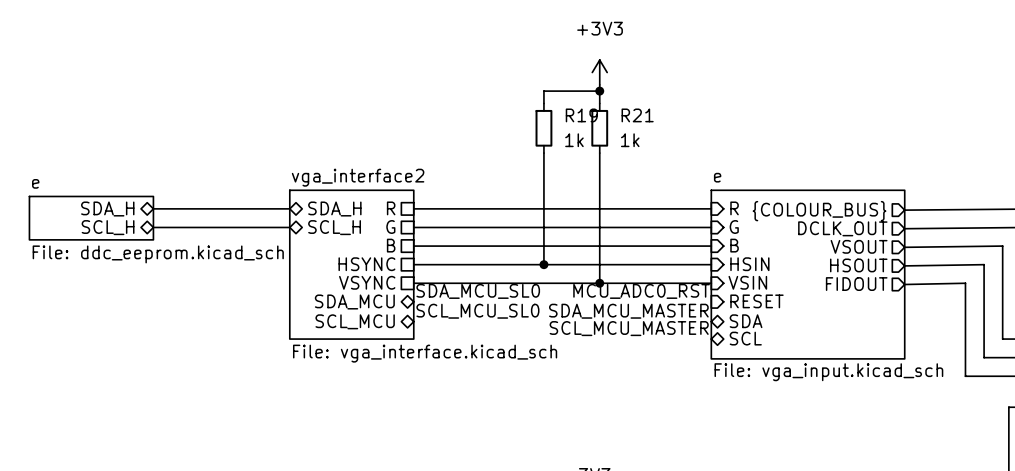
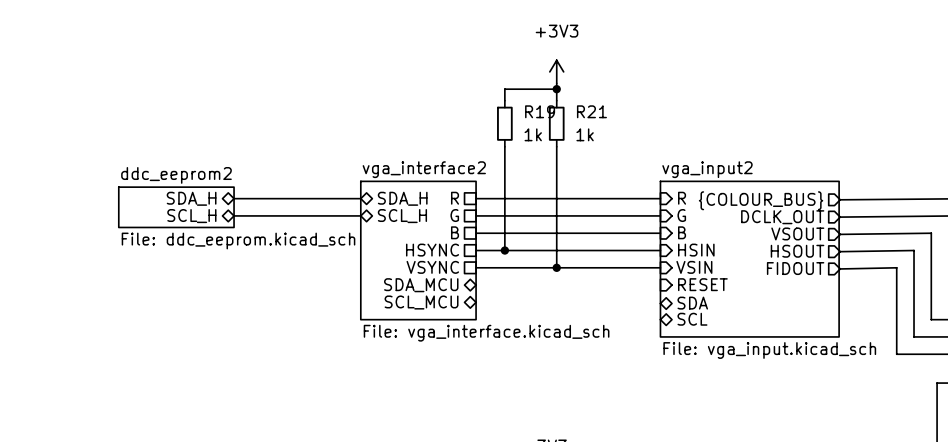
wire: (153, 208) (252, 208) -> none
sheet pin position: R (391, 208) -> R (455, 198)
wire: (413, 208) (512, 208) -> (268, 198) (360, 198)
sheet pin: SDA_H (107, 209) -> none
sheet pin: none -> SDA_H (191, 198)
sheet pin: SDA_H (334, 209) -> none
sheet pin: none -> SDA_H (402, 198)
sheet e: File: ddc_eeprom.kicad_sch (91, 218) -> none
sheet ddc_eeprom2: none -> File: ddc_eeprom.kicad_sch (176, 207)
sheet pin: SCL_H (108, 227) -> none
wire: (153, 227) (252, 227) -> none
sheet pin: none -> SCL_H (191, 216)
sheet pin: SCL_H (334, 227) -> none
sheet pin position: G (390, 227) -> G (454, 215)
wire: (413, 227) (512, 227) -> (268, 215) (360, 215)
sheet pin: none -> SCL_H (402, 216)
sheet pin position: B (391, 245) -> B (455, 232)
wire: (413, 246) (512, 246) -> none
sheet vga_interface2 position: (351, 264) -> (418, 250)
sheet pin position: HSYNC (366, 264) -> HSYNC (432, 250)
wire: (413, 264) (512, 264) -> none
sheet vga_input2: none -> File: vga_input.kicad_sch (749, 259)
sheet e: File: vga_input.kicad_sch (808, 274) -> none
sheet pin position: VSYNC (367, 282) -> VSYNC (432, 267)
wire: (413, 283) (512, 283) -> none
label: SDA_MCU_SL0 (478, 291) -> none
label: MCU_ADC0_RST (641, 291) -> none
sheet pin position: SDA_MCU (354, 301) -> SDA_MCU (421, 285)
label: SCL_MCU_SL0 (477, 311) -> none
label: SDA_MCU_MASTER (628, 311) -> none
sheet pin position: SCL_MCU (355, 321) -> SCL_MCU (421, 302)
label: SCL_MCU_MASTER (629, 328) -> none

